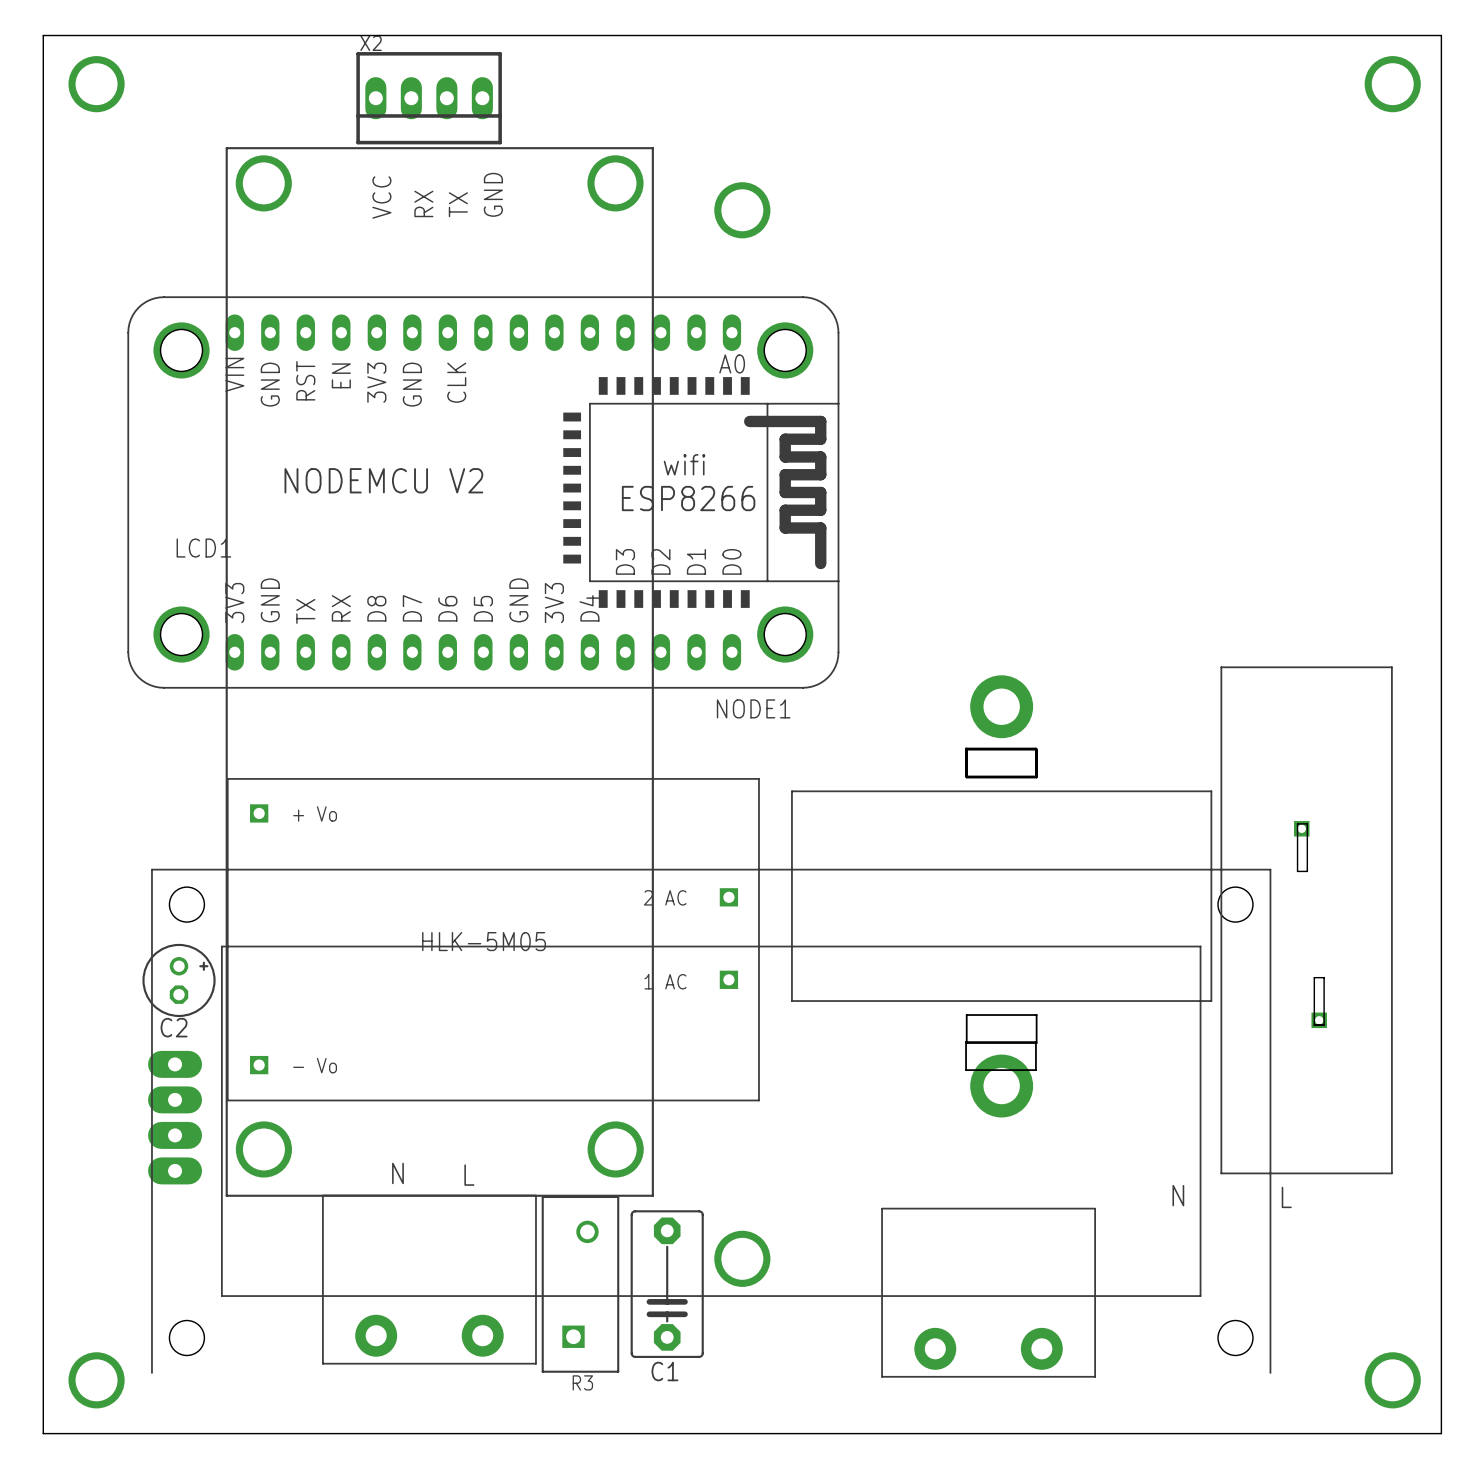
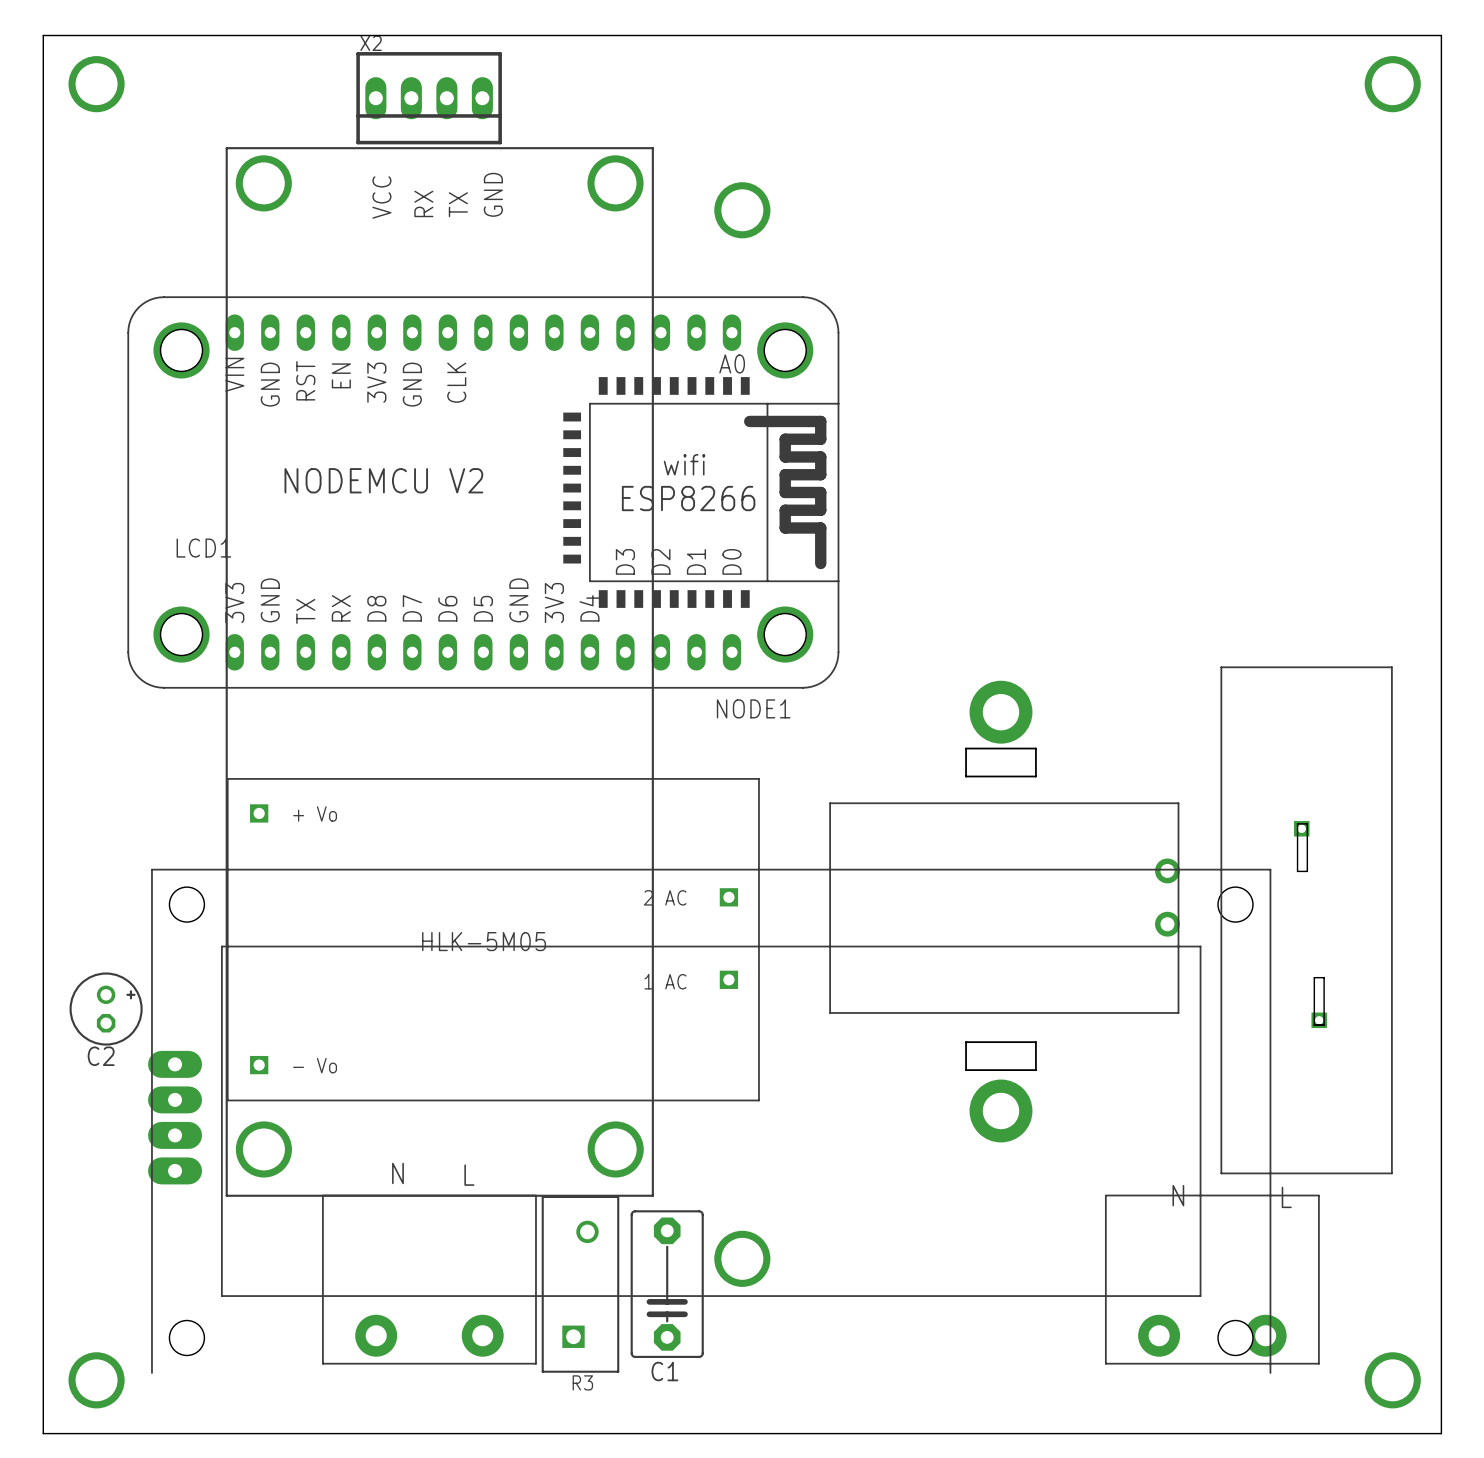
part footprint: [791, 675, 1213, 1118] -> [829, 802, 1180, 1014]
via: none -> (1000, 712)
C2 position: (179, 980) -> (106, 1009)
via: none -> (1000, 1110)
part position: (988, 1292) -> (1212, 1279)

